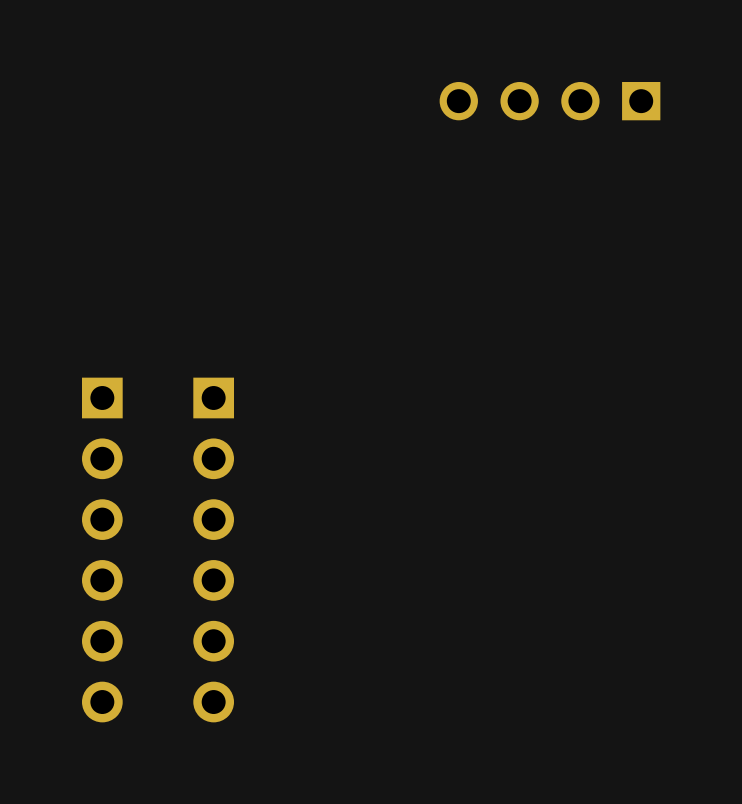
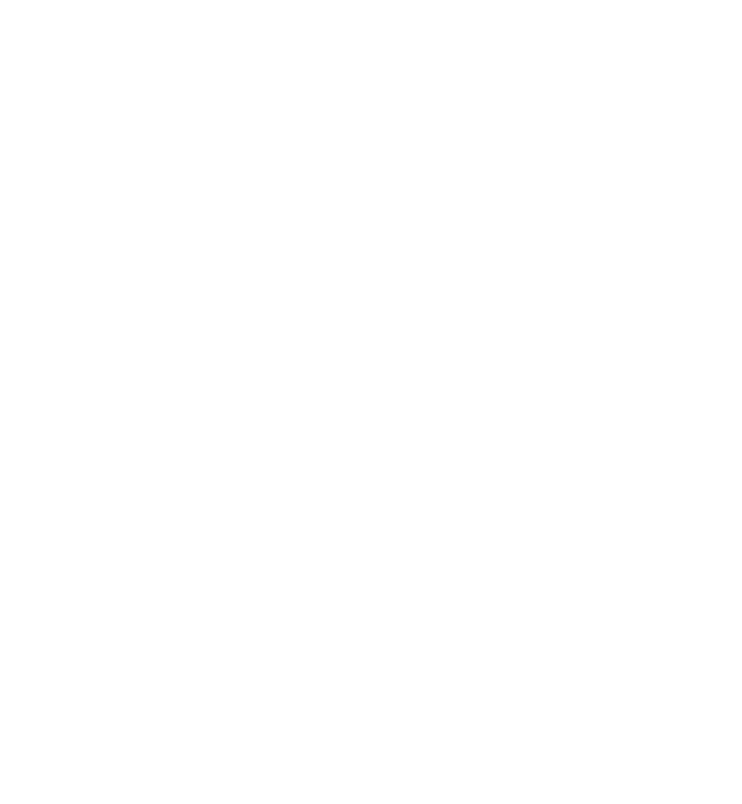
part: (550, 101) -> none
part: (102, 550) -> none
part: (213, 550) -> none

